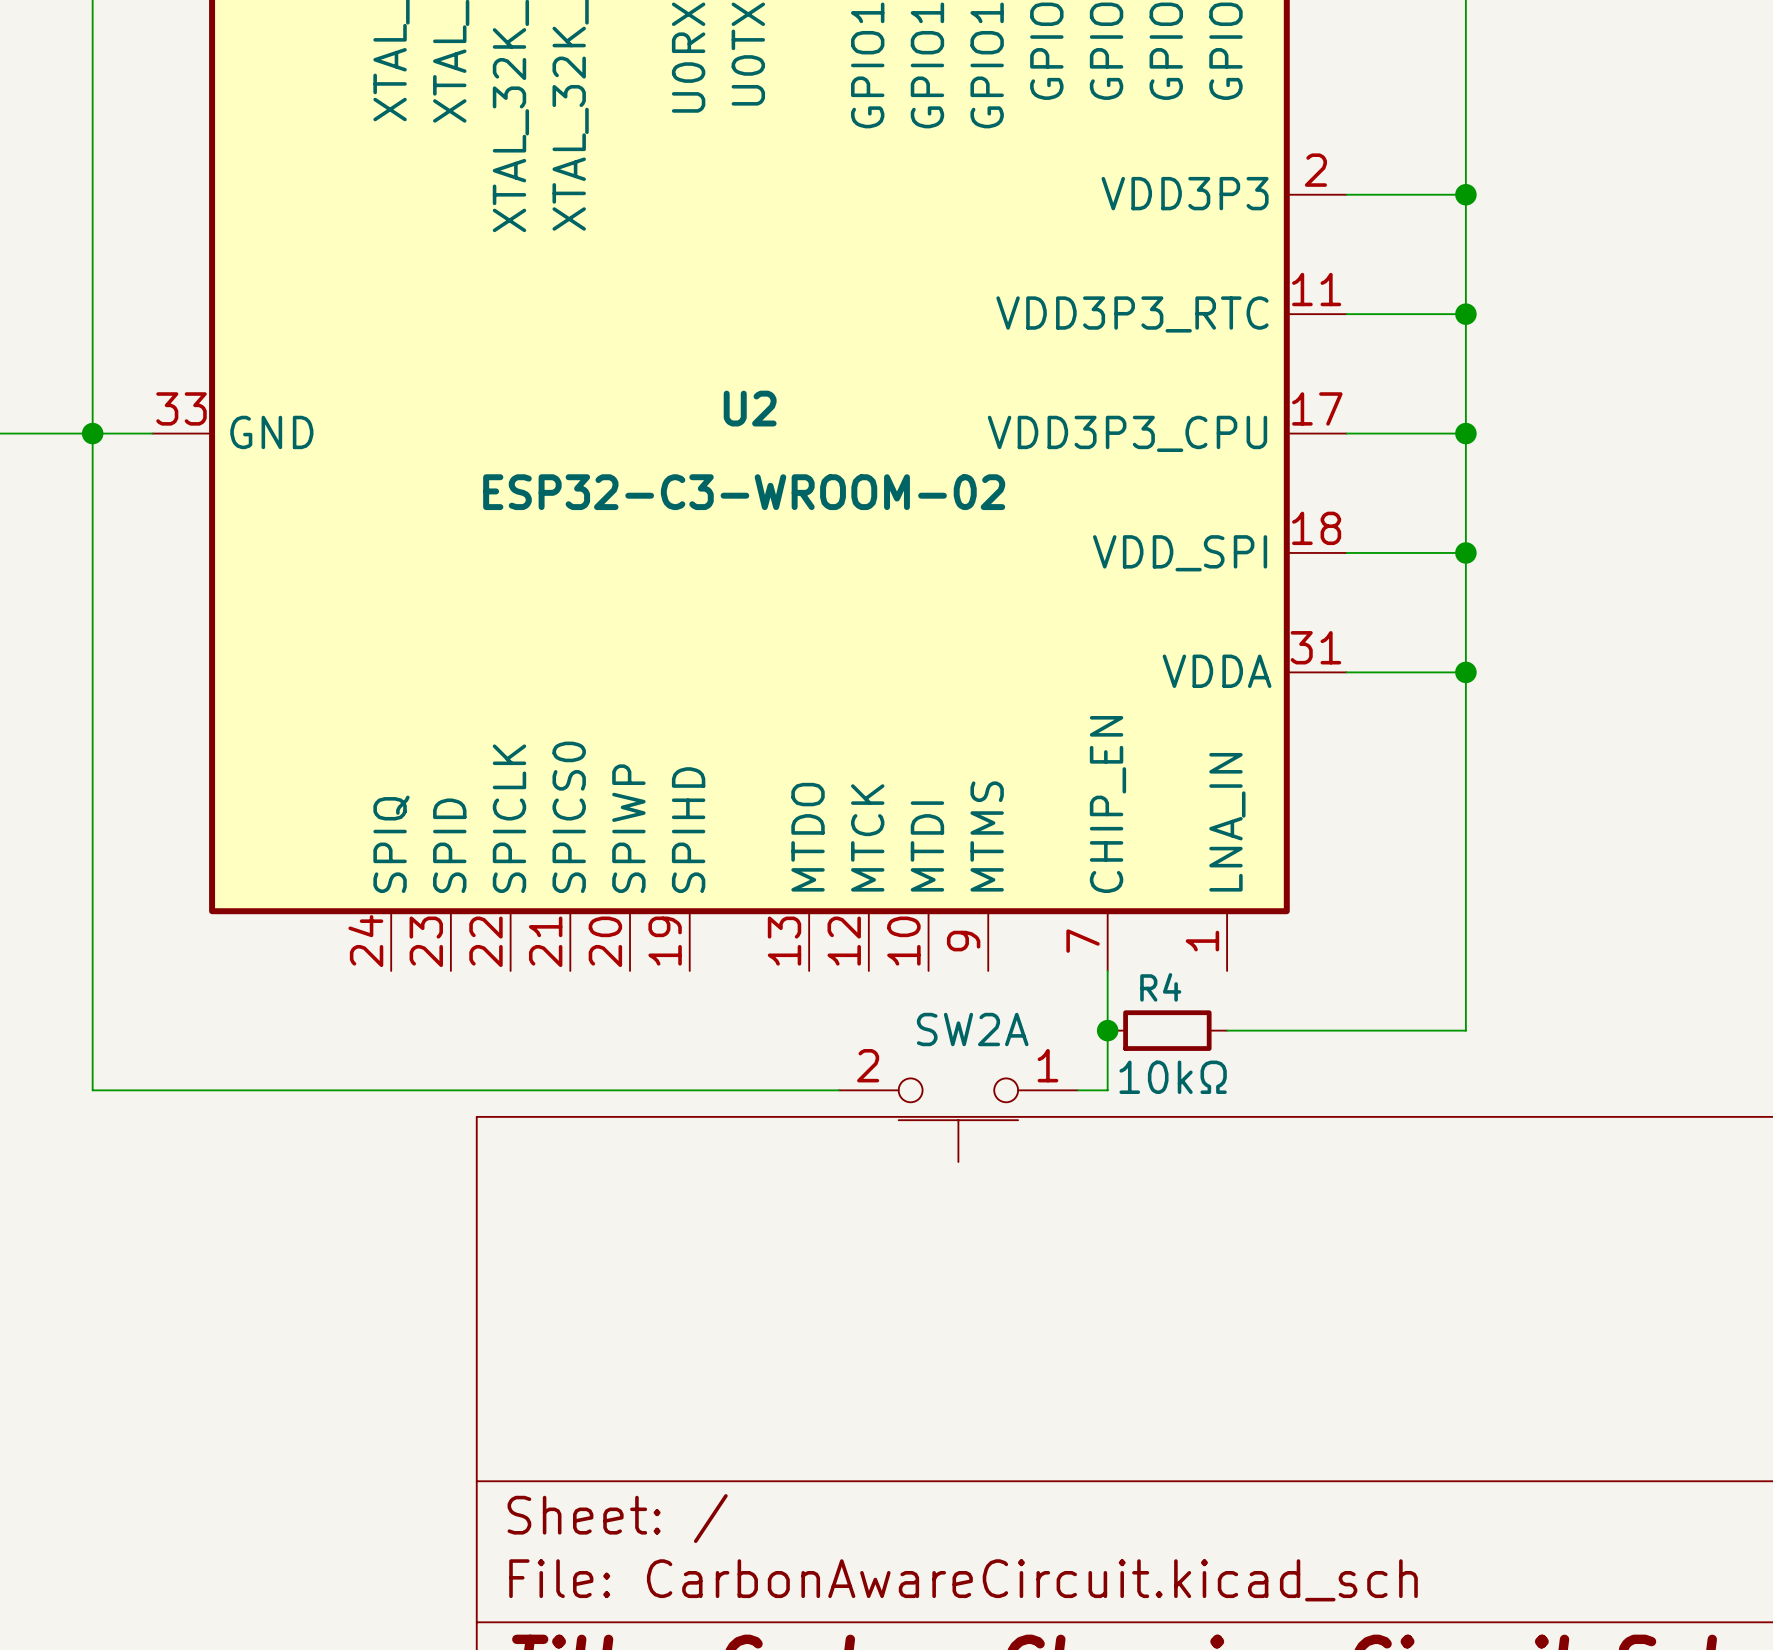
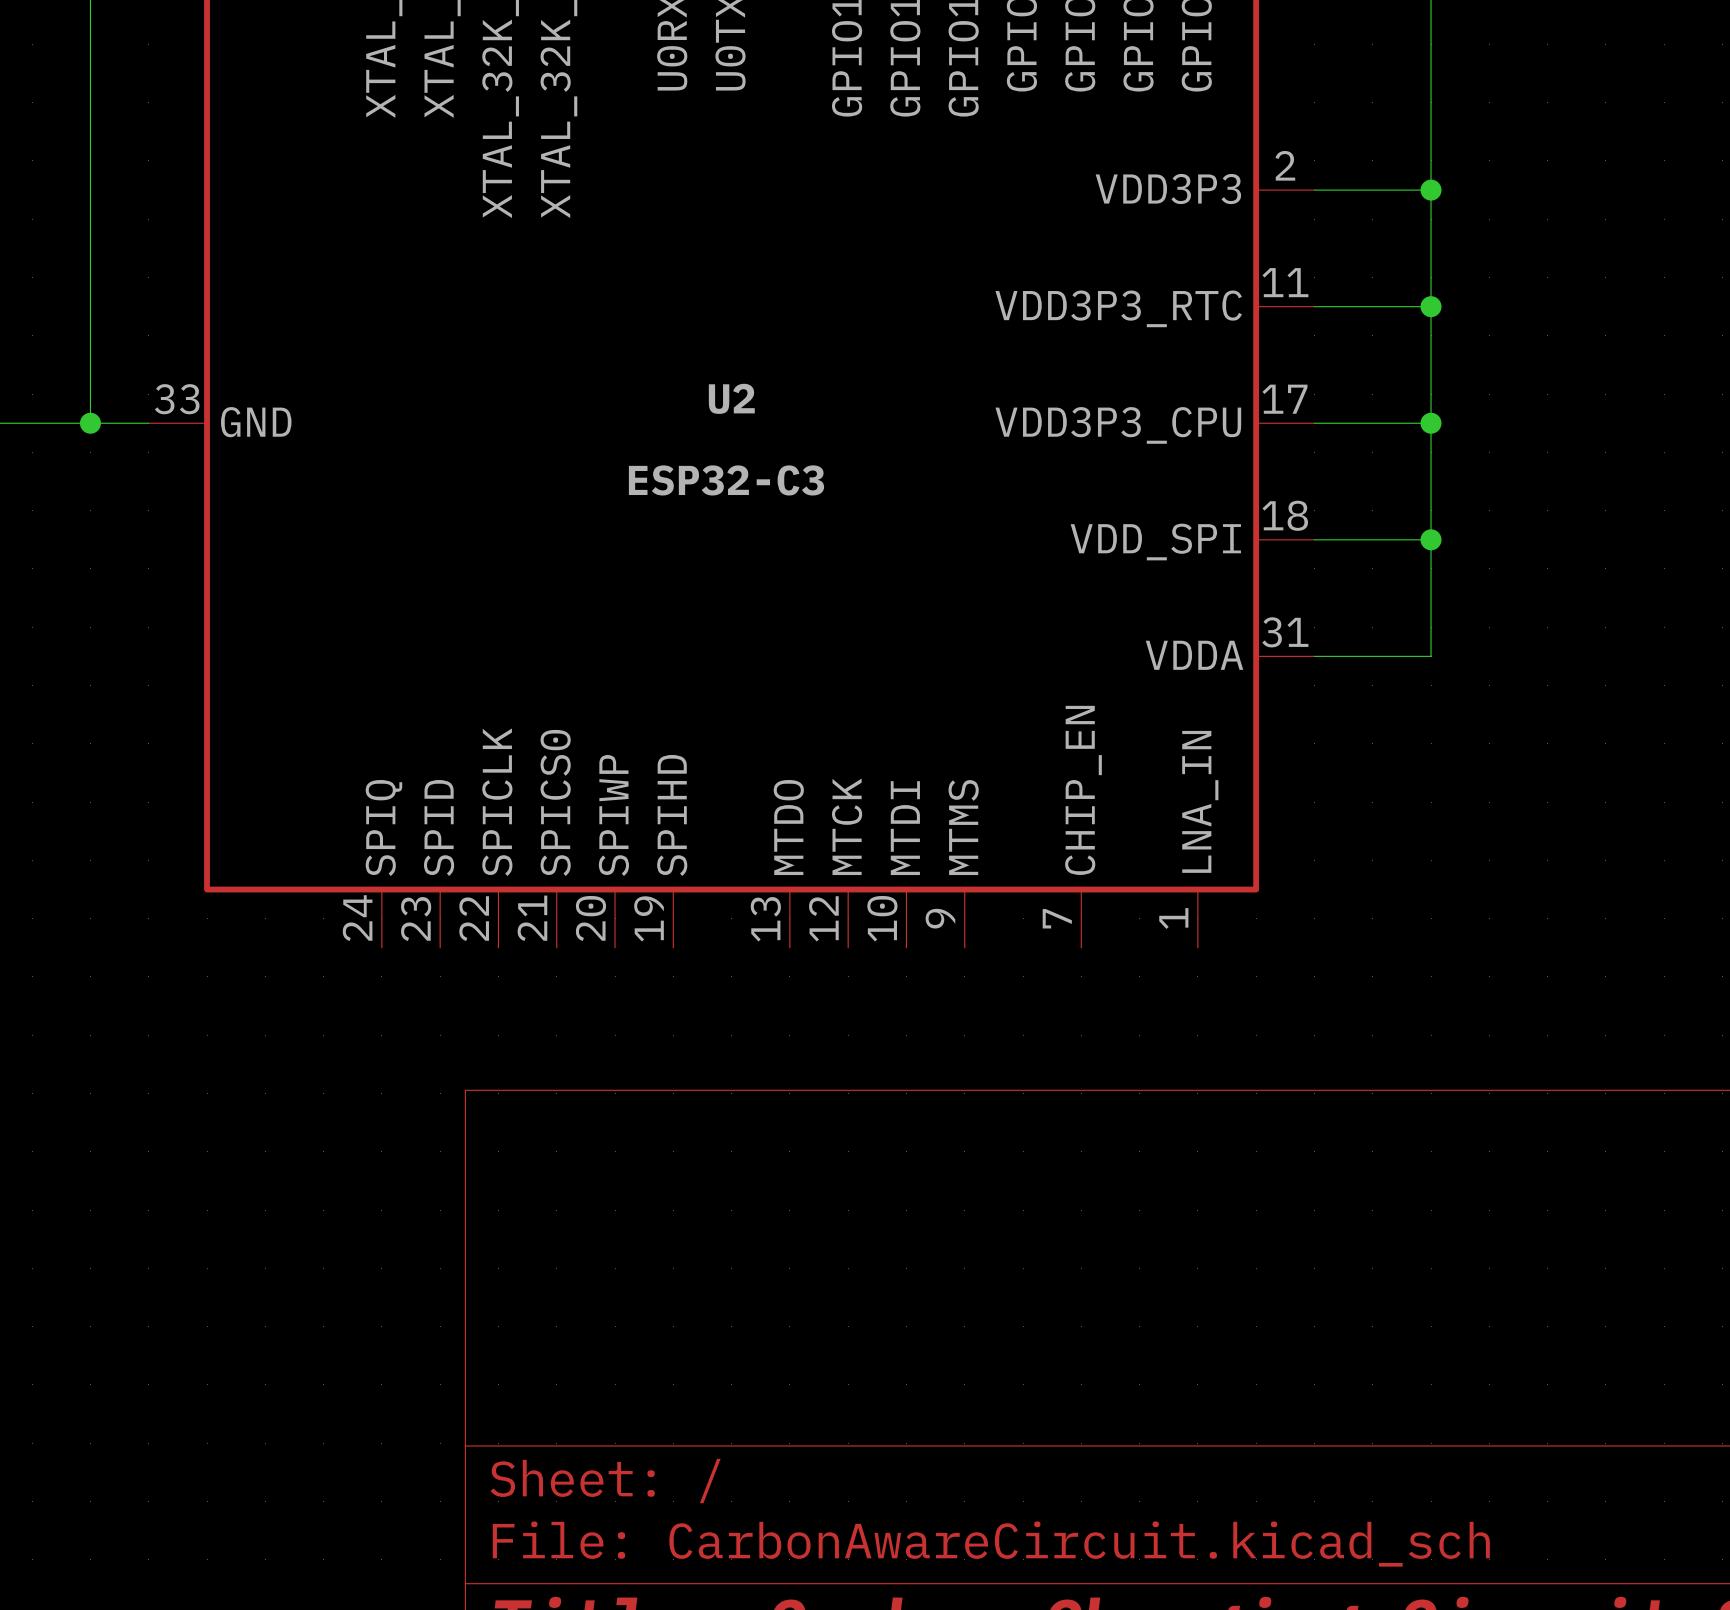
wire: (92, 433) (92, 1090) (838, 1090) -> none
U2 value: ESP32-C3-WROOM-02 (744, 492) -> ESP32-C3 (726, 480)
wire: (1465, 672) (1465, 1030) (1227, 1030) -> none
junction: (1465, 672) -> none
wire: (1107, 970) (1107, 1090) (1077, 1090) -> none
junction: (1107, 1030) -> none
R4: 10kΩ (1167, 1030) -> none
SW2A: (958, 1120) -> none

